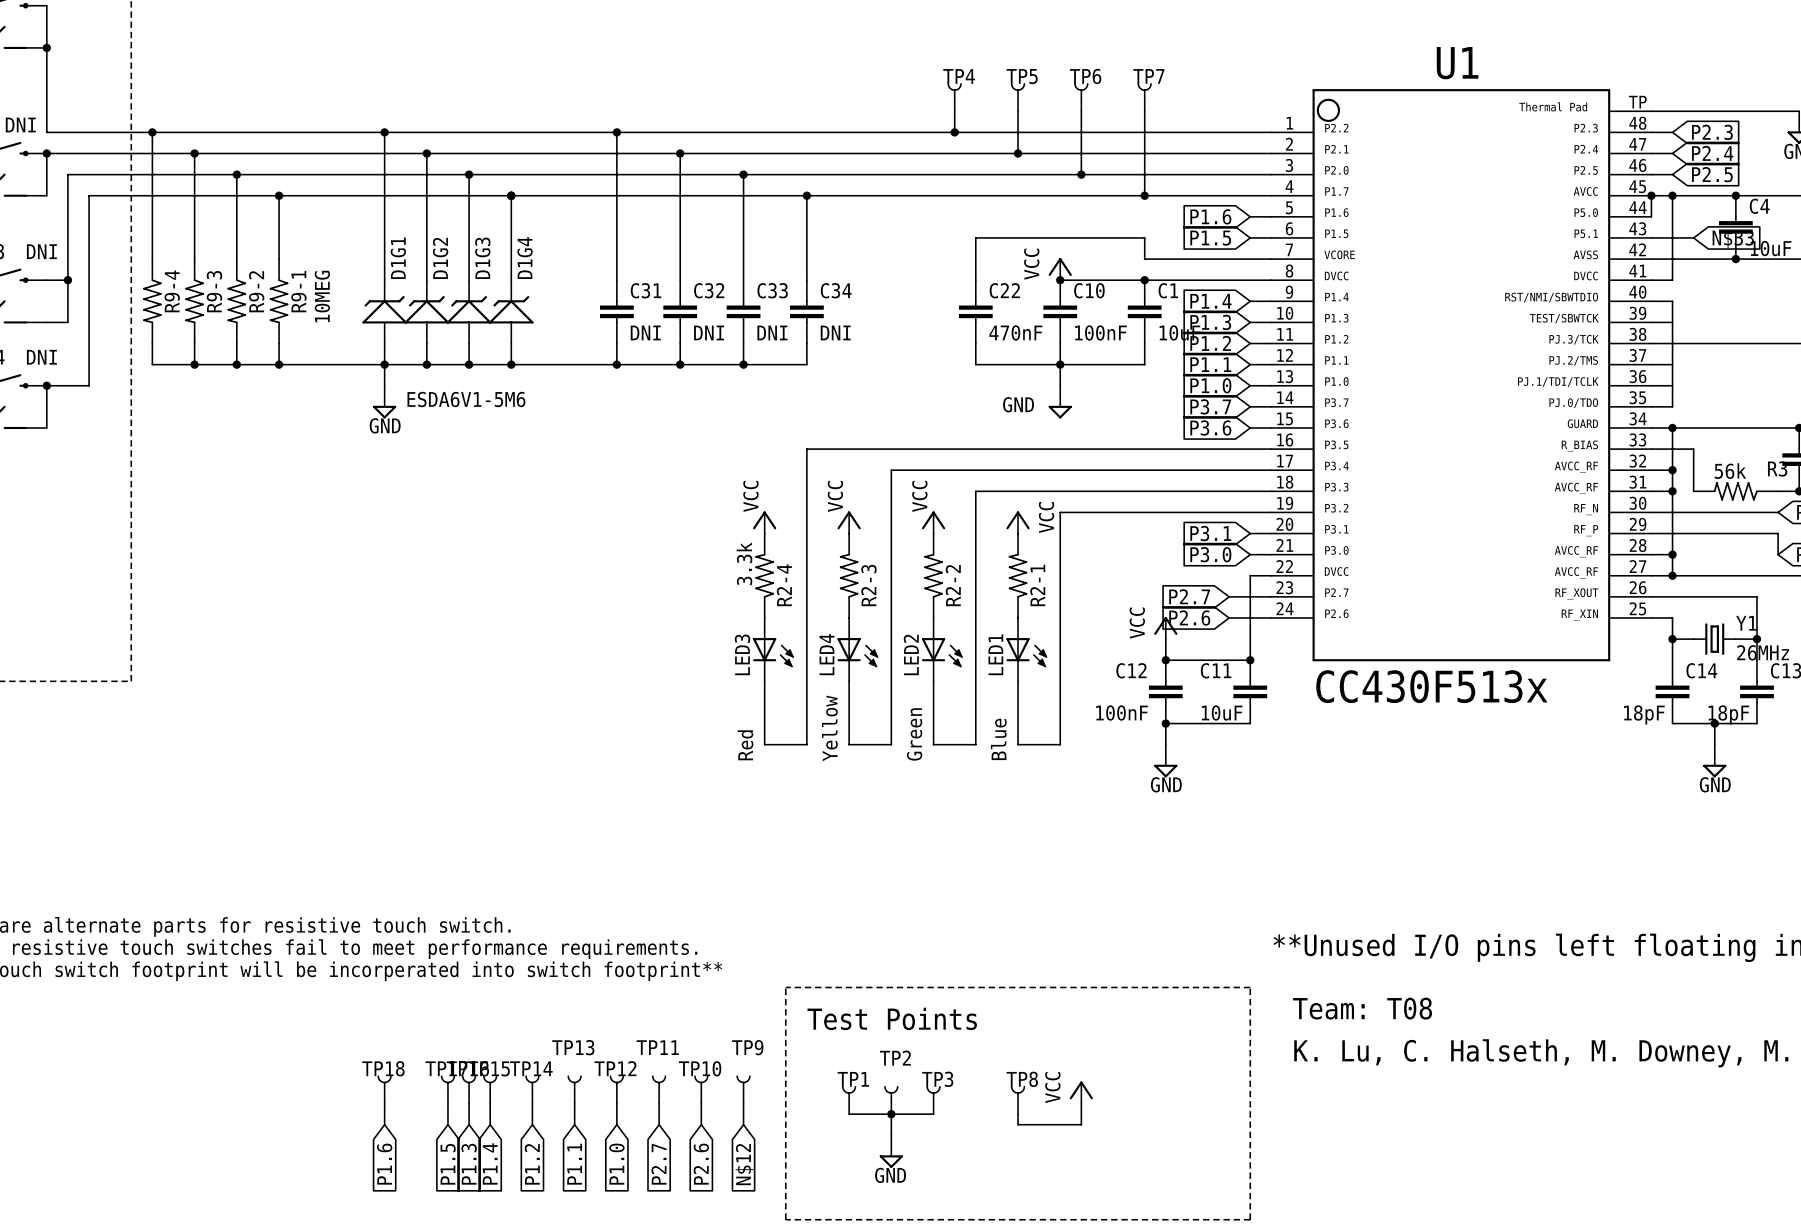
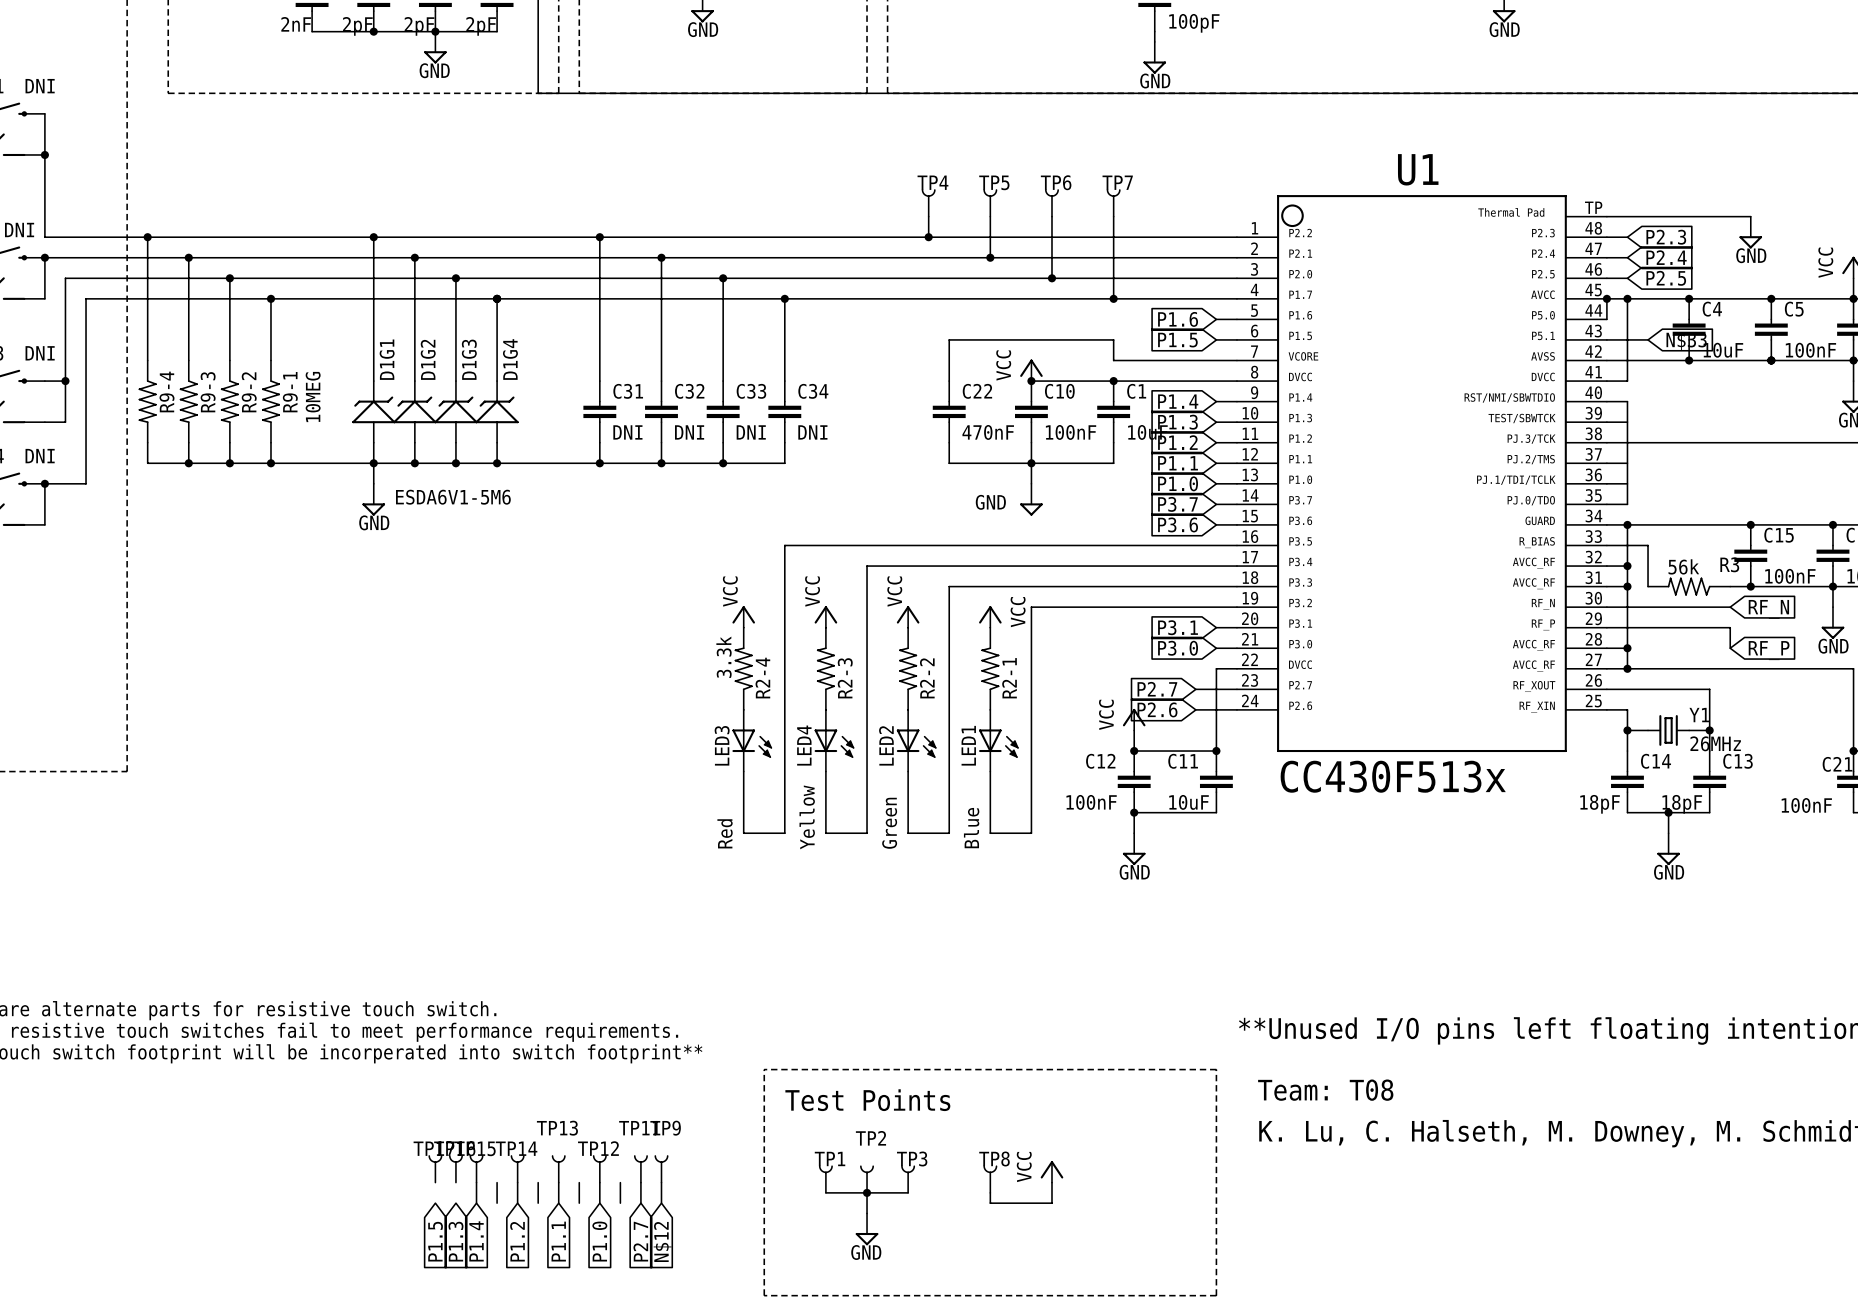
TP18: (384, 1089) -> none
TP10: (701, 1089) -> none
TP9 position: (743, 1089) -> (661, 1169)
wire: (384, 1103) (384, 1124) -> (497, 1182) (497, 1203)
wire: (447, 1103) (447, 1124) -> (538, 1182) (538, 1203)
wire: (469, 1103) (469, 1124) -> (579, 1182) (579, 1203)
wire: (701, 1103) (701, 1124) -> (620, 1182) (620, 1203)
wire: (743, 1103) (743, 1124) -> (661, 1182) (661, 1203)
global label: P1.6 (384, 1164) -> none
global label: P2.6 (701, 1164) -> none
global label position: N$12 (744, 1164) -> N$12 (662, 1241)

